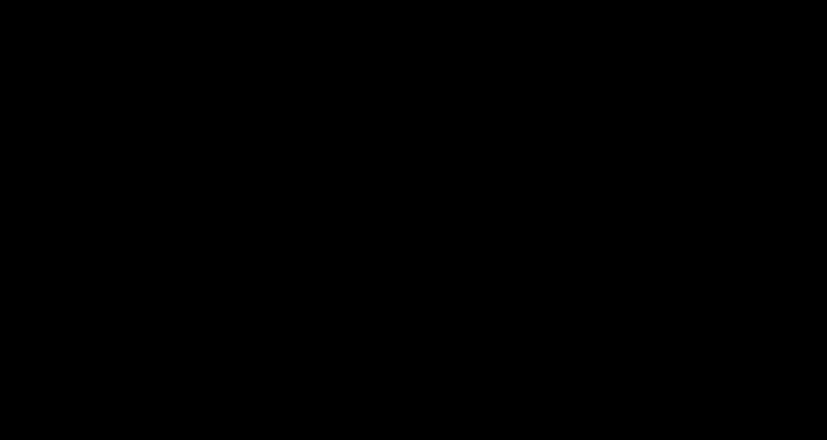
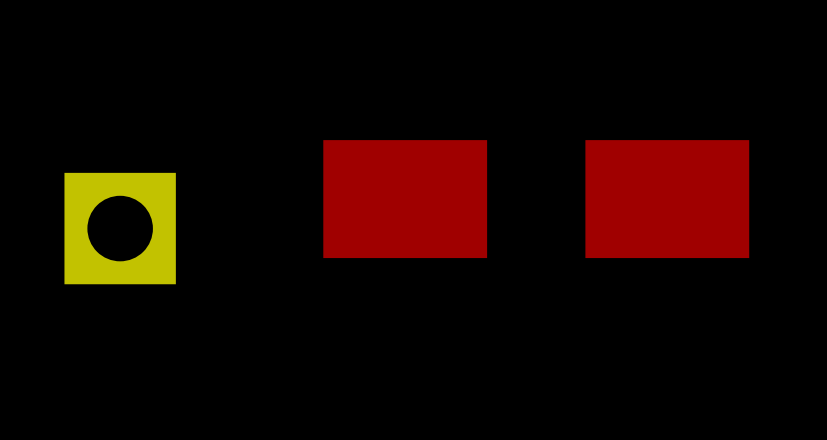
part: none -> (536, 199)
part: none -> (120, 228)

